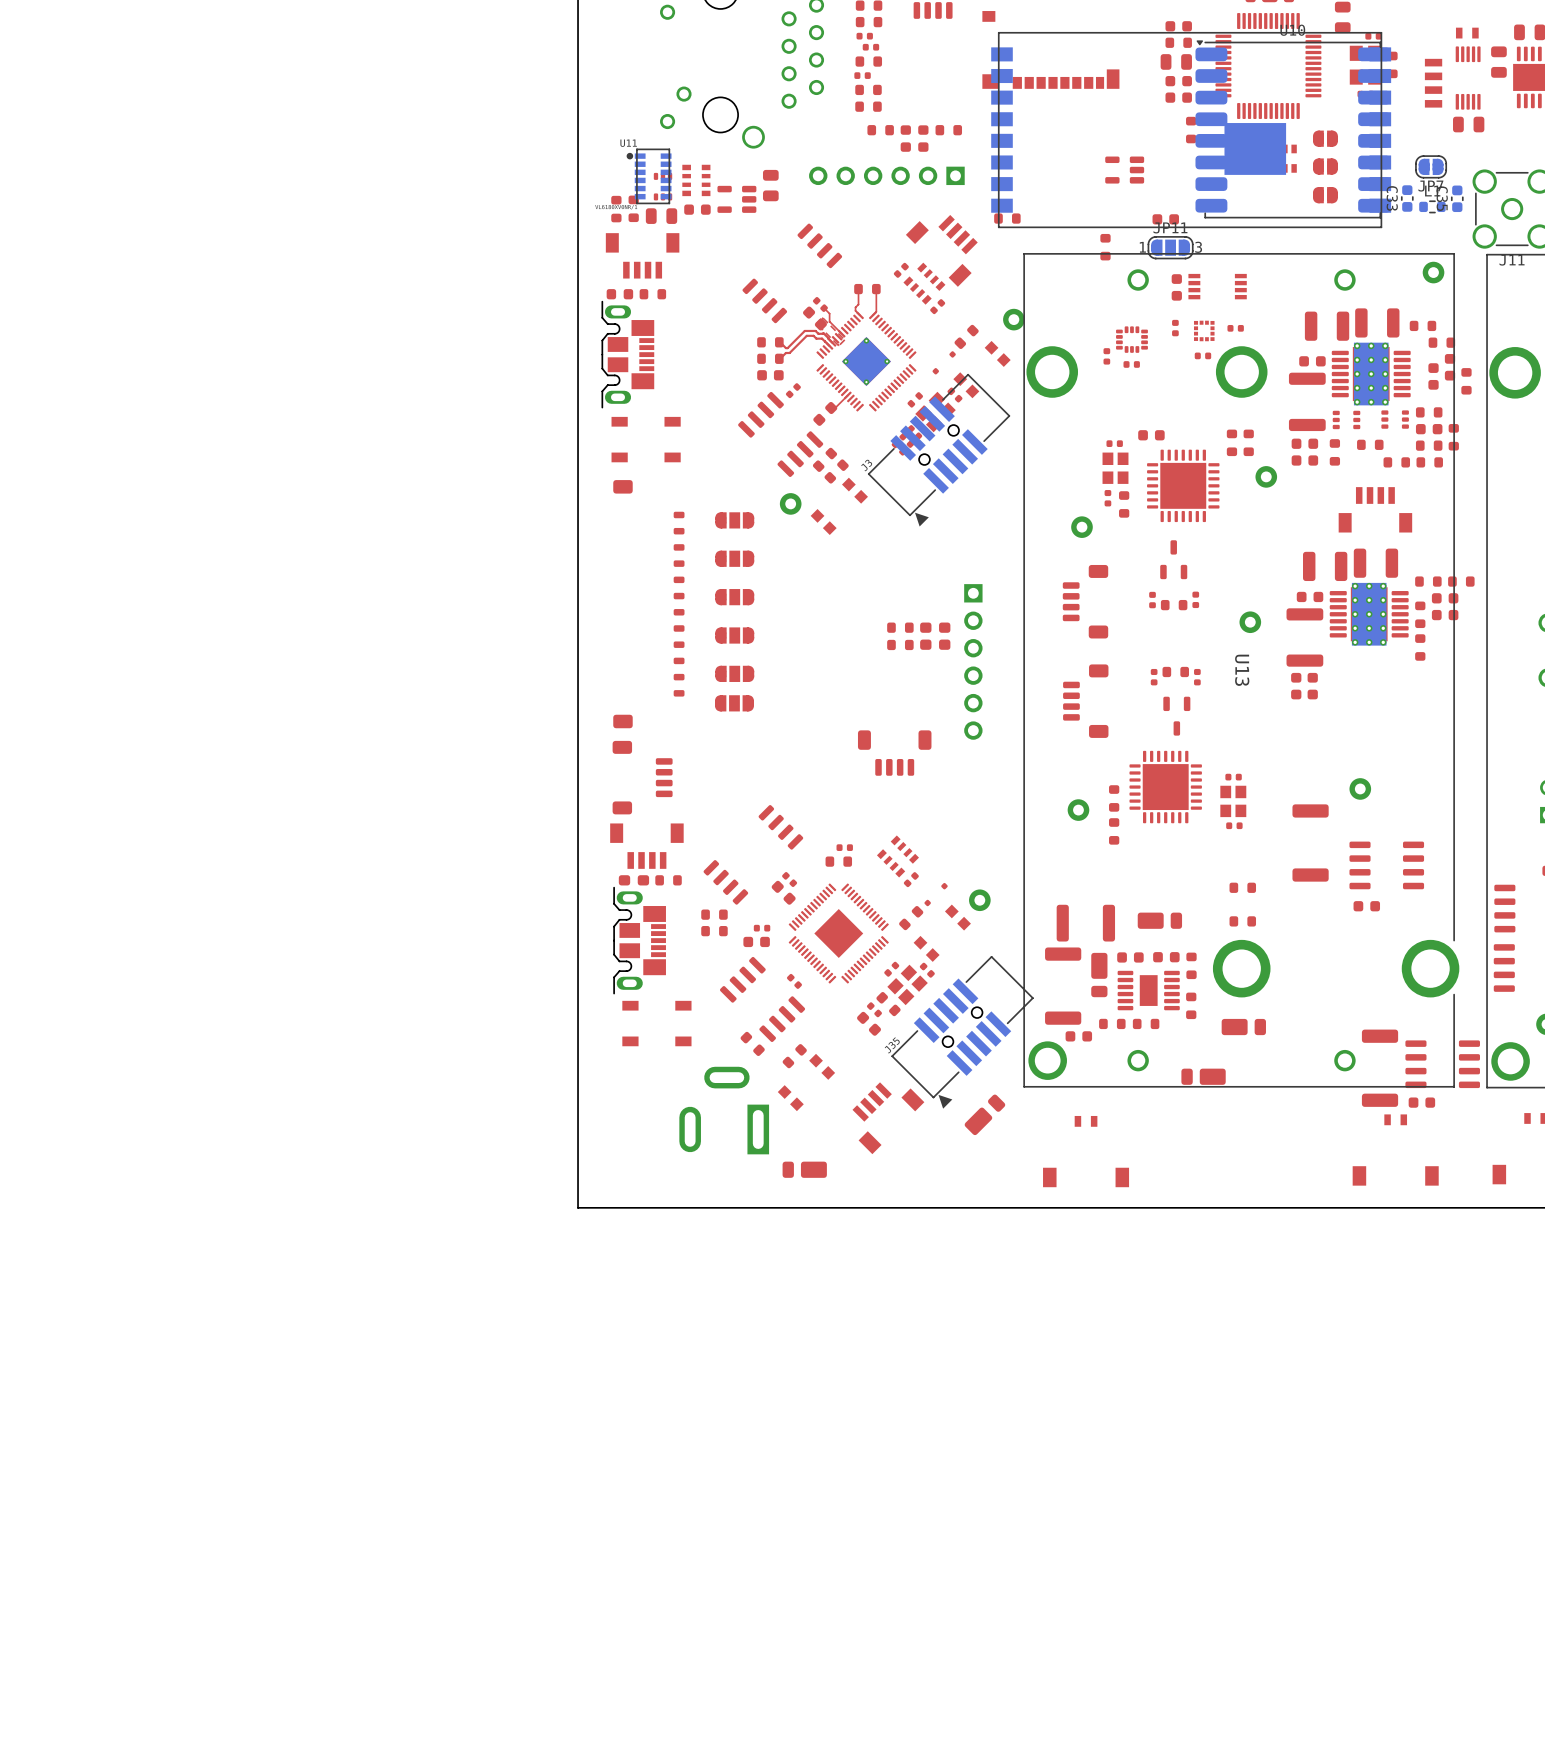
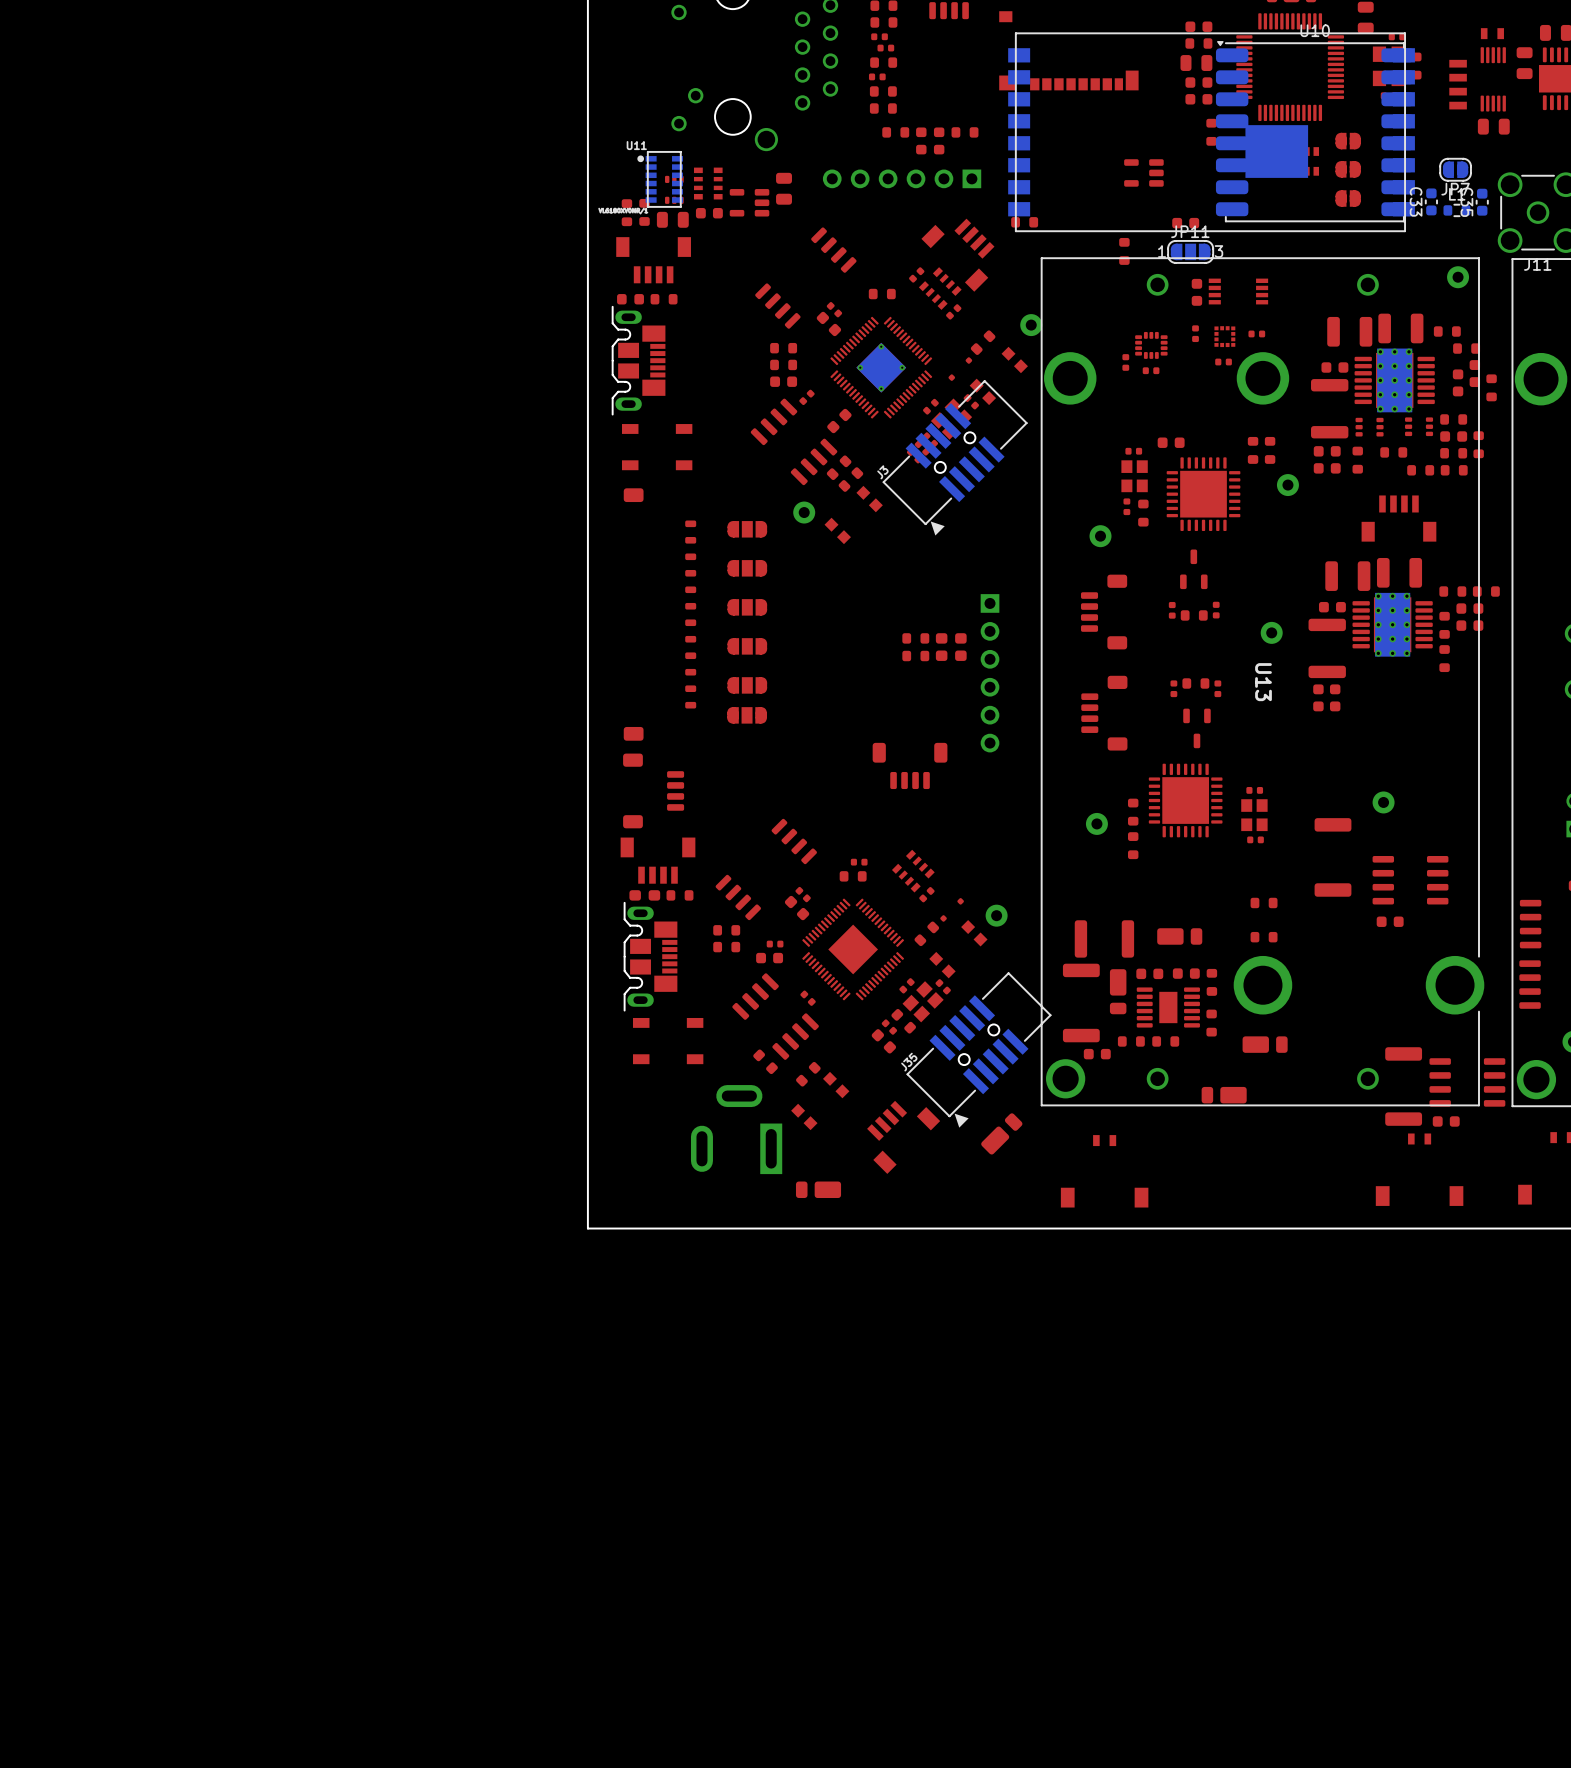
top track: (858, 289) (858, 304) (855, 310) (860, 315) -> none
top track: (876, 289) (876, 311) (872, 315) -> none
top track: (824, 308) (829, 313) (829, 321) (841, 333) -> none
top zone outline: (823, 318) (844, 339) (839, 345) (816, 323) (823, 318) -> none
top track: (825, 341) (829, 345) -> none
top track: (825, 341) (813, 335) (806, 335) (789, 352) (785, 352) (779, 358) -> none
top track: (779, 342) (787, 348) (804, 330) (815, 330) (818, 333) (823, 333) (832, 342) -> none
top track: (847, 395) (835, 408) (831, 408) -> none

